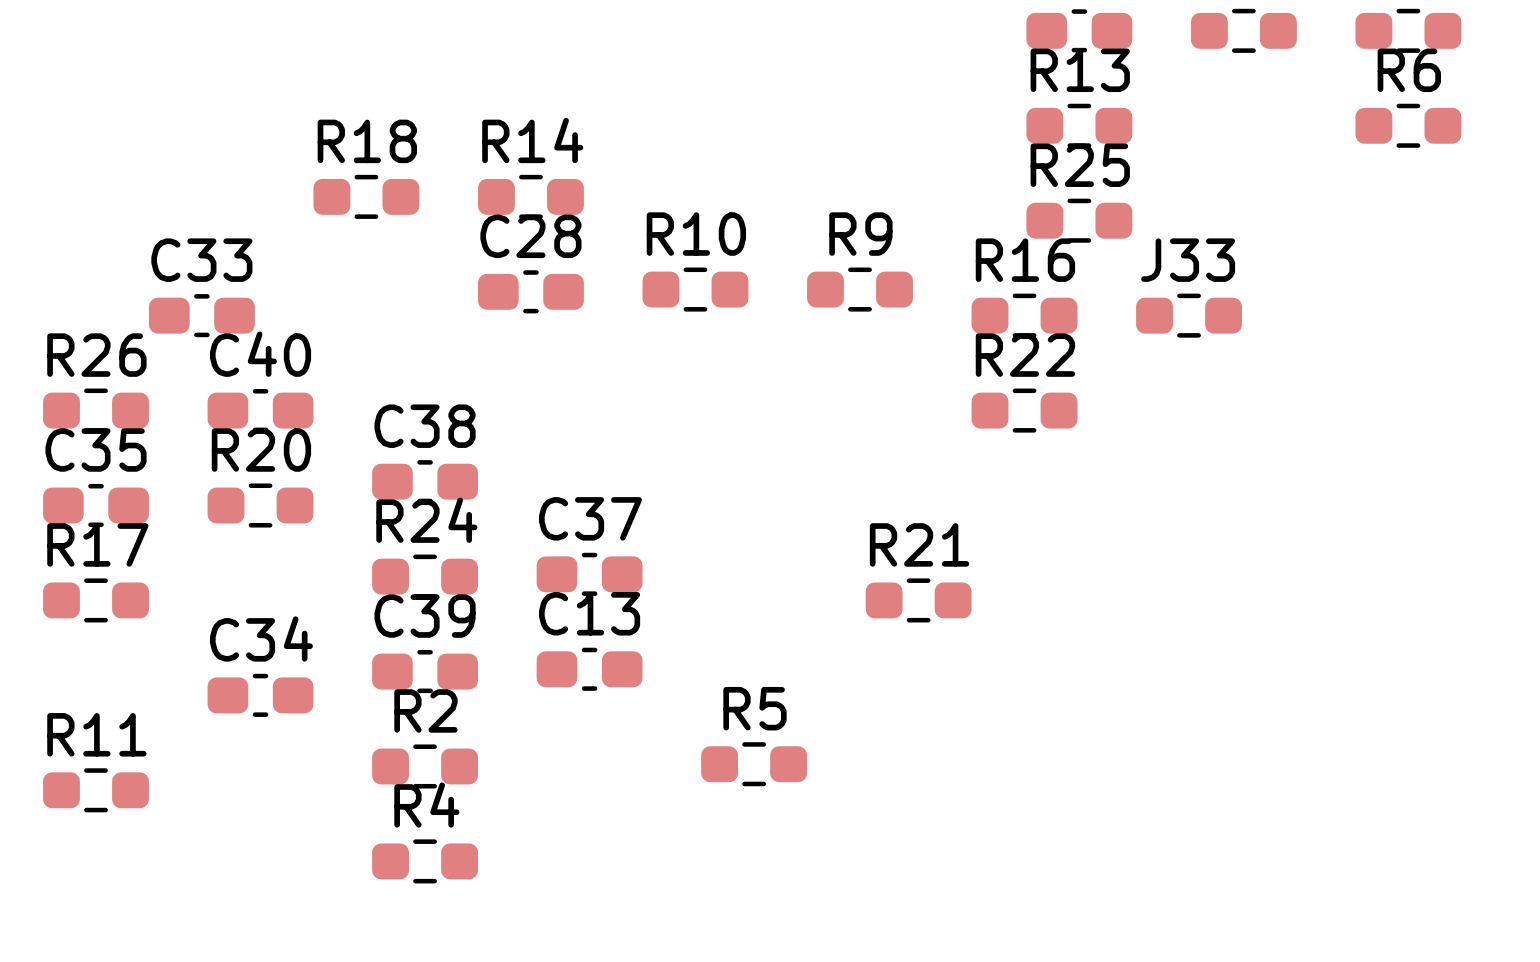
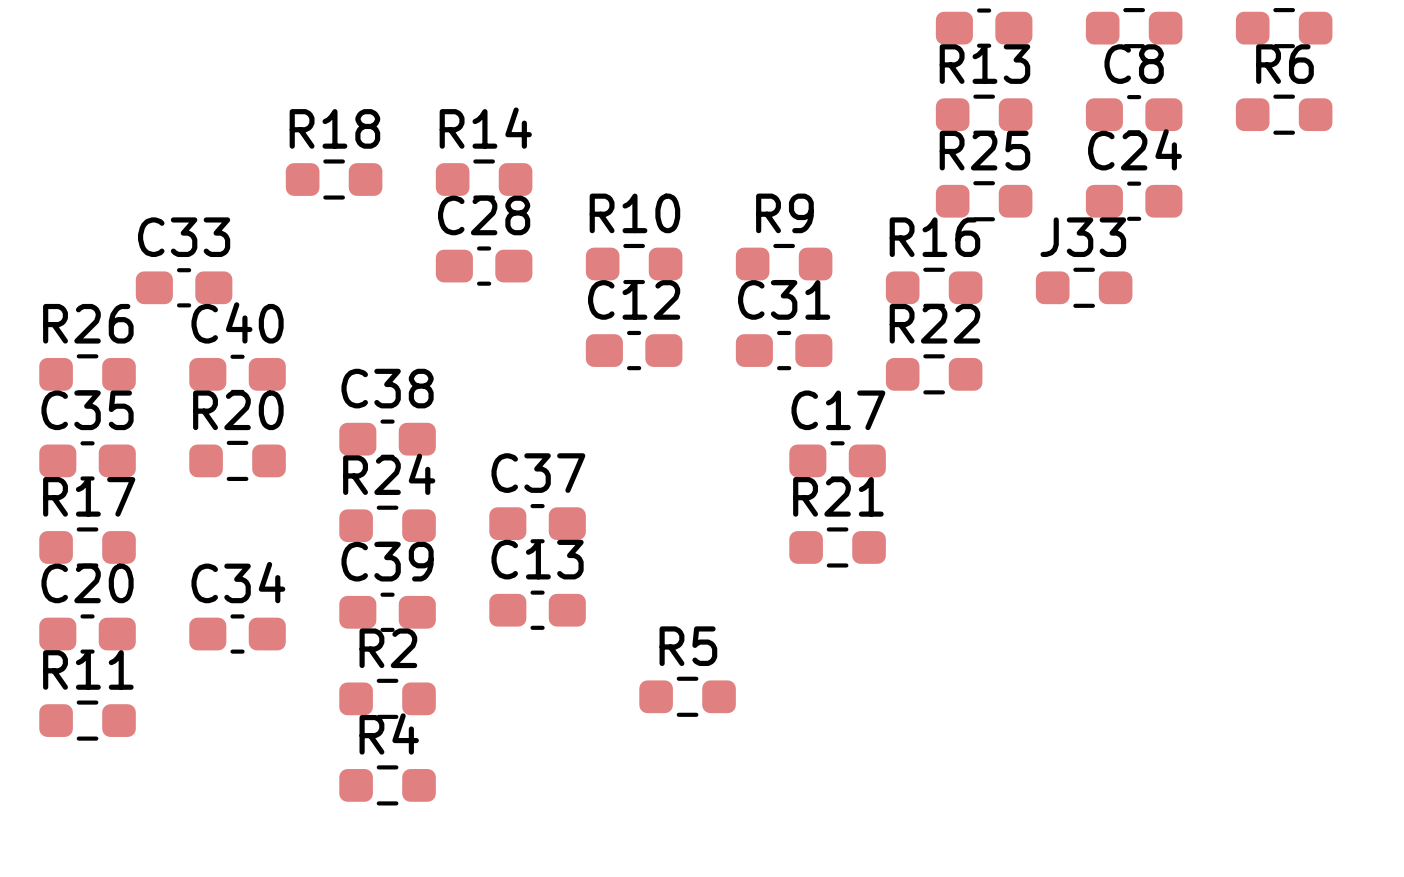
C8: none -> (1134, 114)
C24: none -> (1134, 201)
C12: none -> (634, 350)
C31: none -> (784, 350)
C17: none -> (837, 460)
C20: none -> (87, 634)

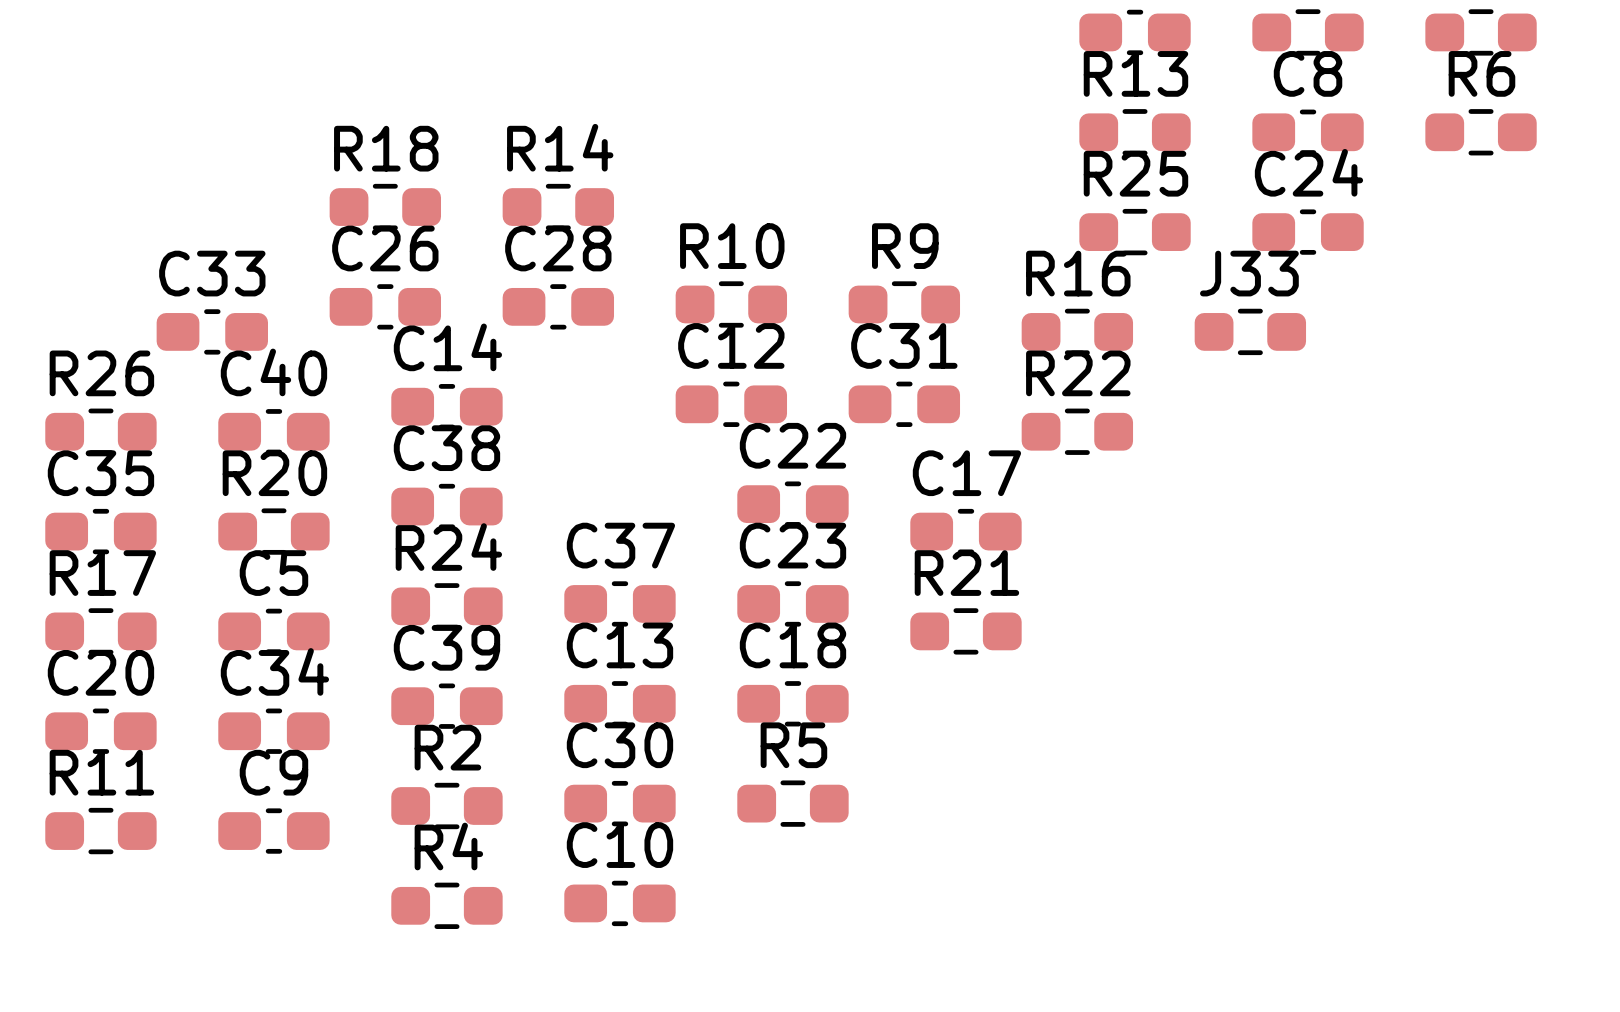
C26: none -> (385, 306)
C14: none -> (446, 406)
C22: none -> (792, 504)
C23: none -> (792, 603)
C5: none -> (273, 631)
C18: none -> (792, 703)
C30: none -> (619, 803)
C9: none -> (273, 831)
C10: none -> (619, 903)

